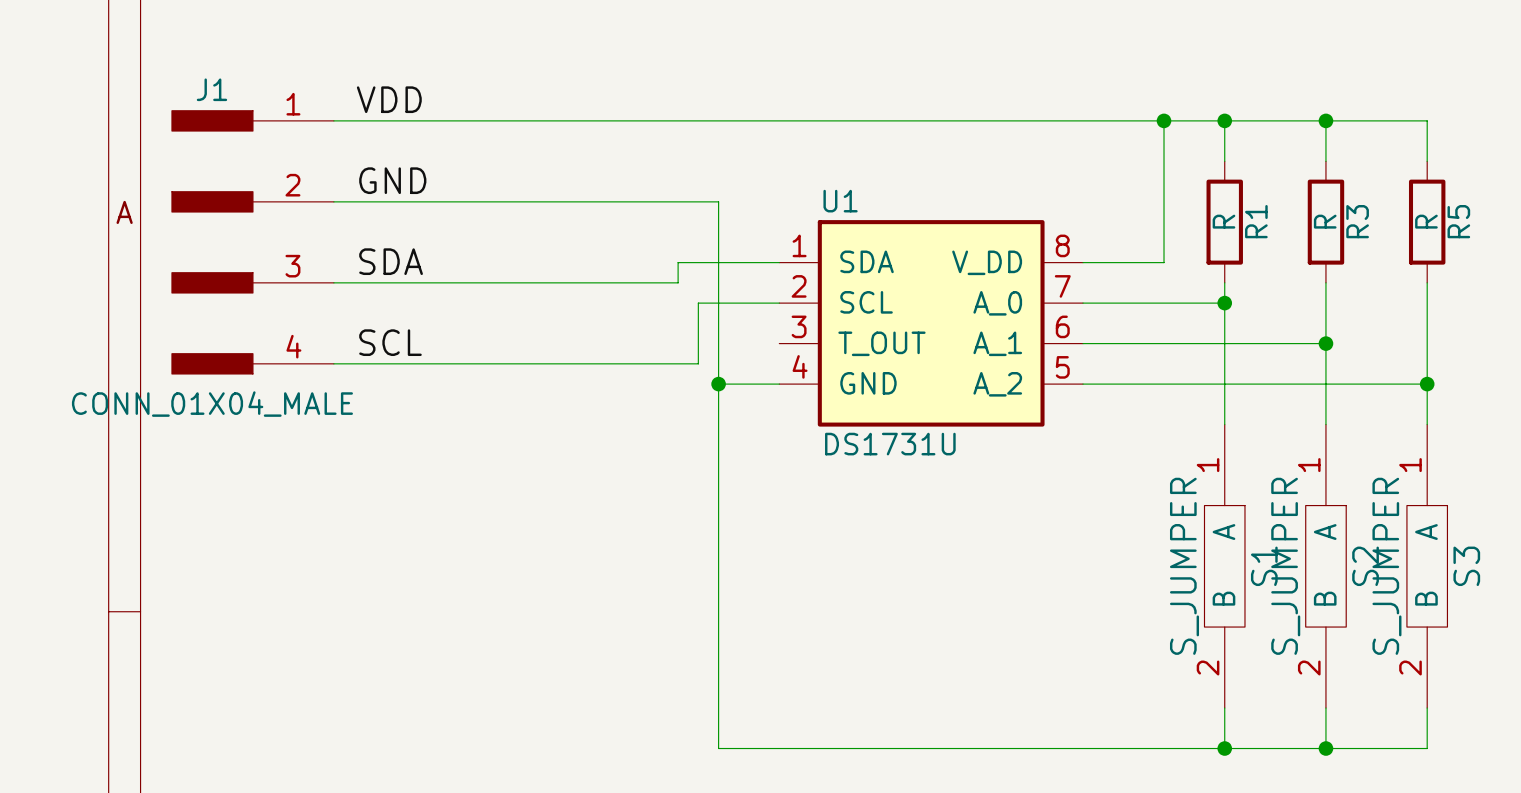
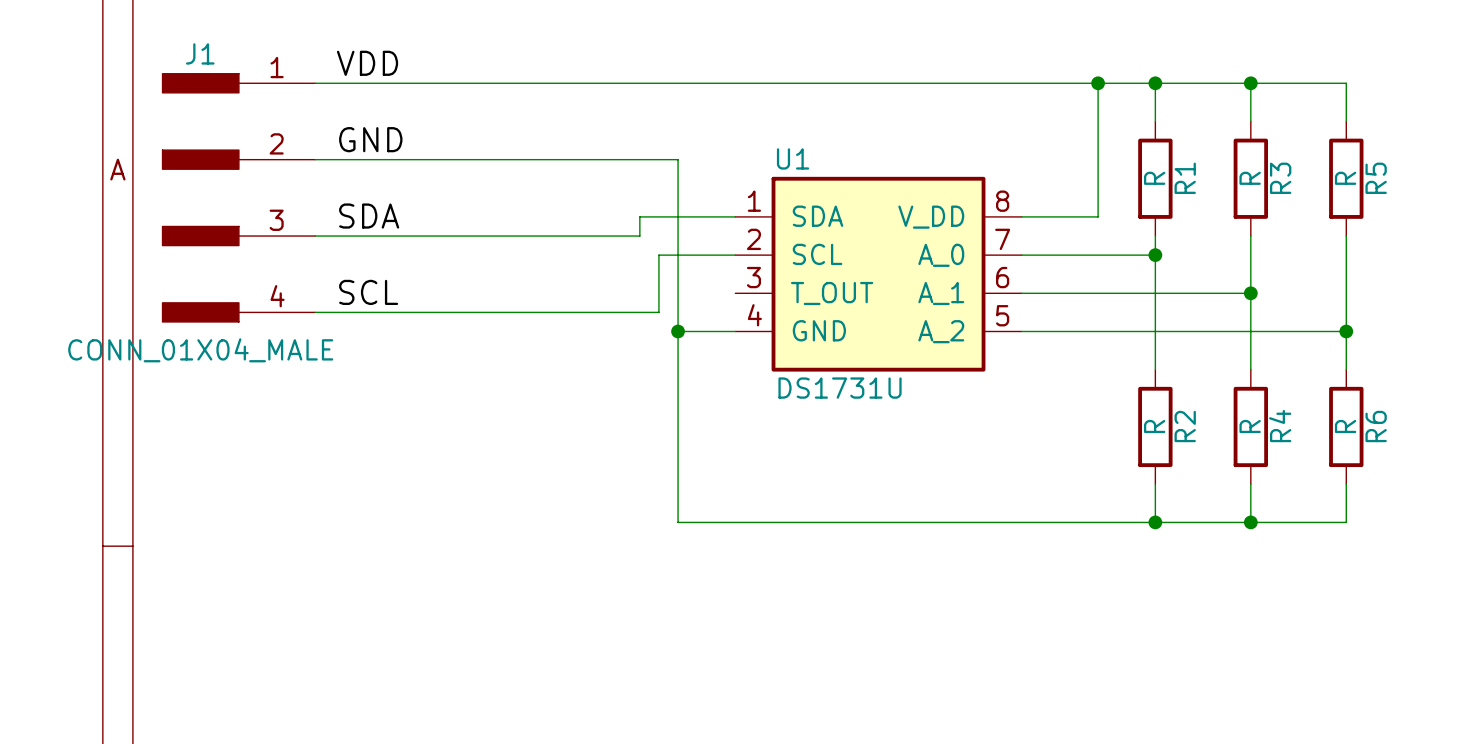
R2: none -> R (1155, 426)
R4: none -> R (1250, 426)
R6: none -> R (1346, 426)
S1: S_JUMPER (1224, 566) -> none
S2: S_JUMPER (1325, 566) -> none
S3: S_JUMPER (1427, 566) -> none
wire: (718, 586) (718, 748) (1427, 748) (1427, 708) -> (678, 522) (1346, 522) (1346, 484)
junction: none -> (1155, 522)
junction: none -> (1250, 522)
wire: (1224, 708) (1224, 748) -> (1155, 484) (1155, 522)
wire: (1325, 708) (1325, 748) -> (1250, 484) (1250, 522)
junction: (1224, 748) -> none
junction: (1325, 748) -> none

